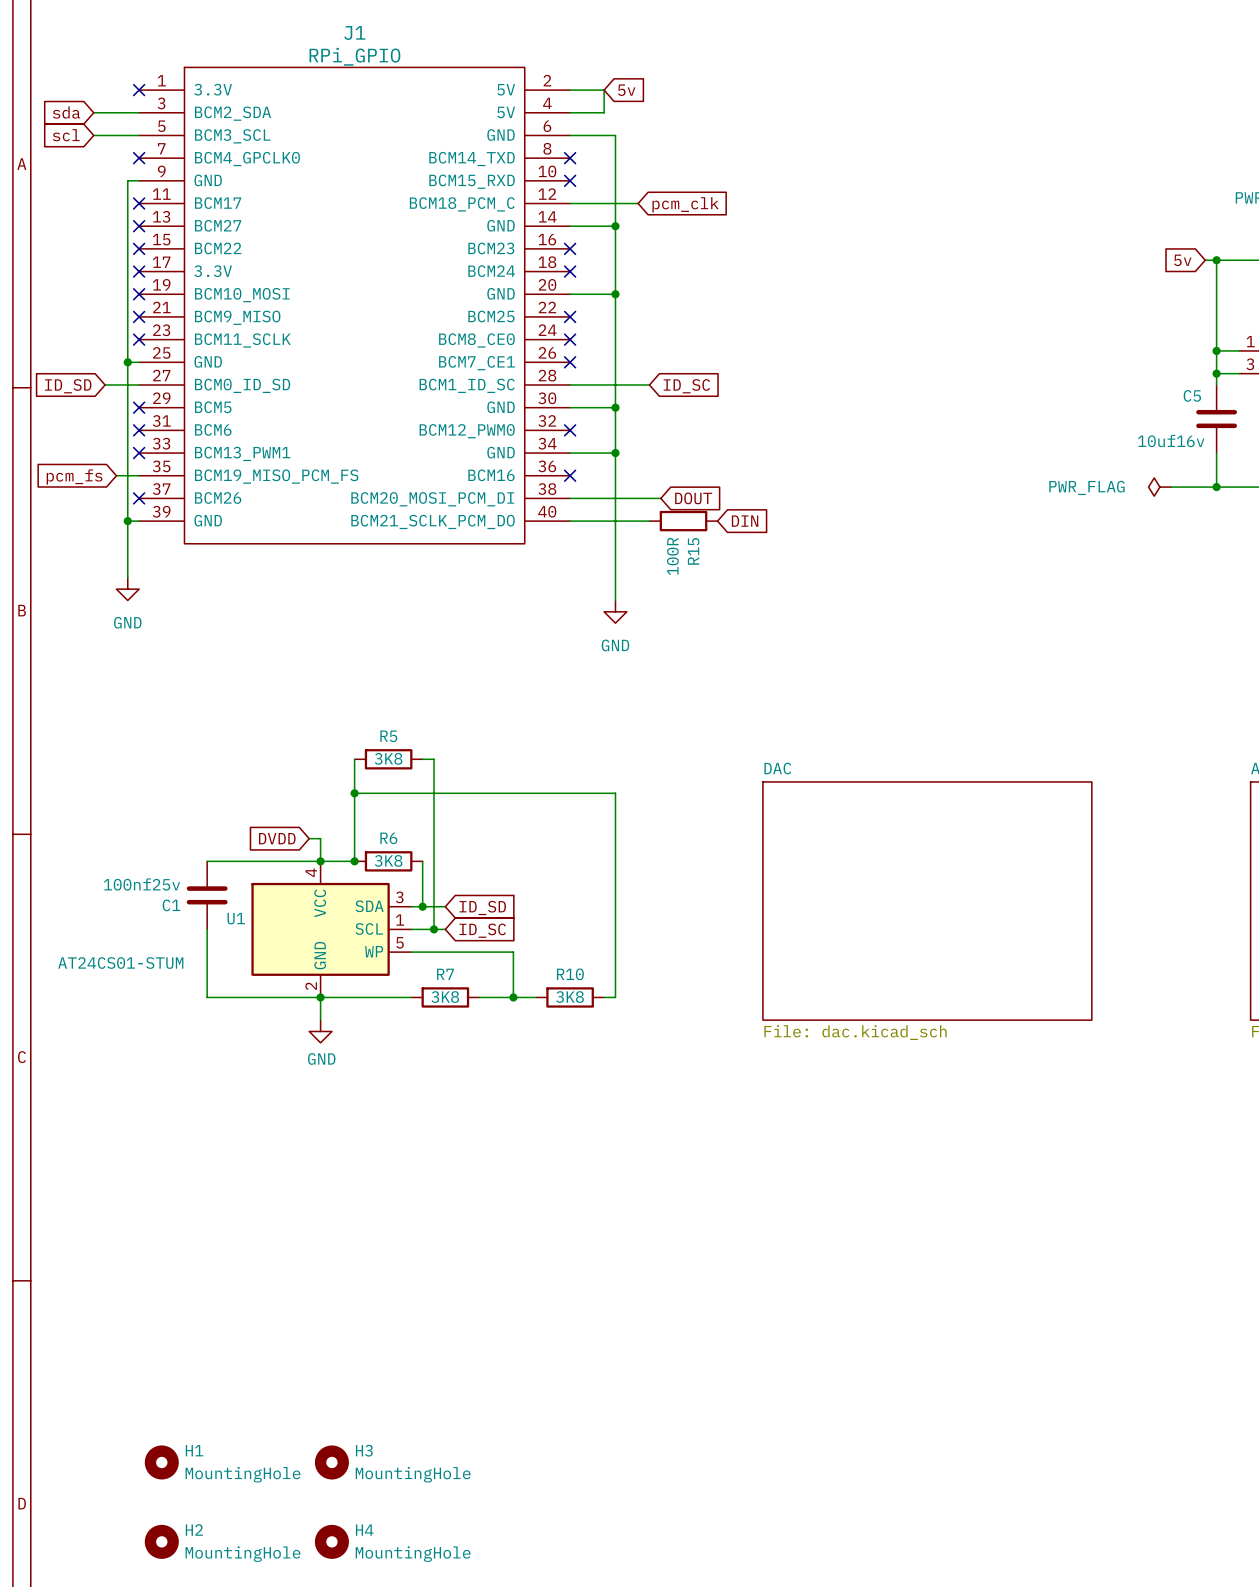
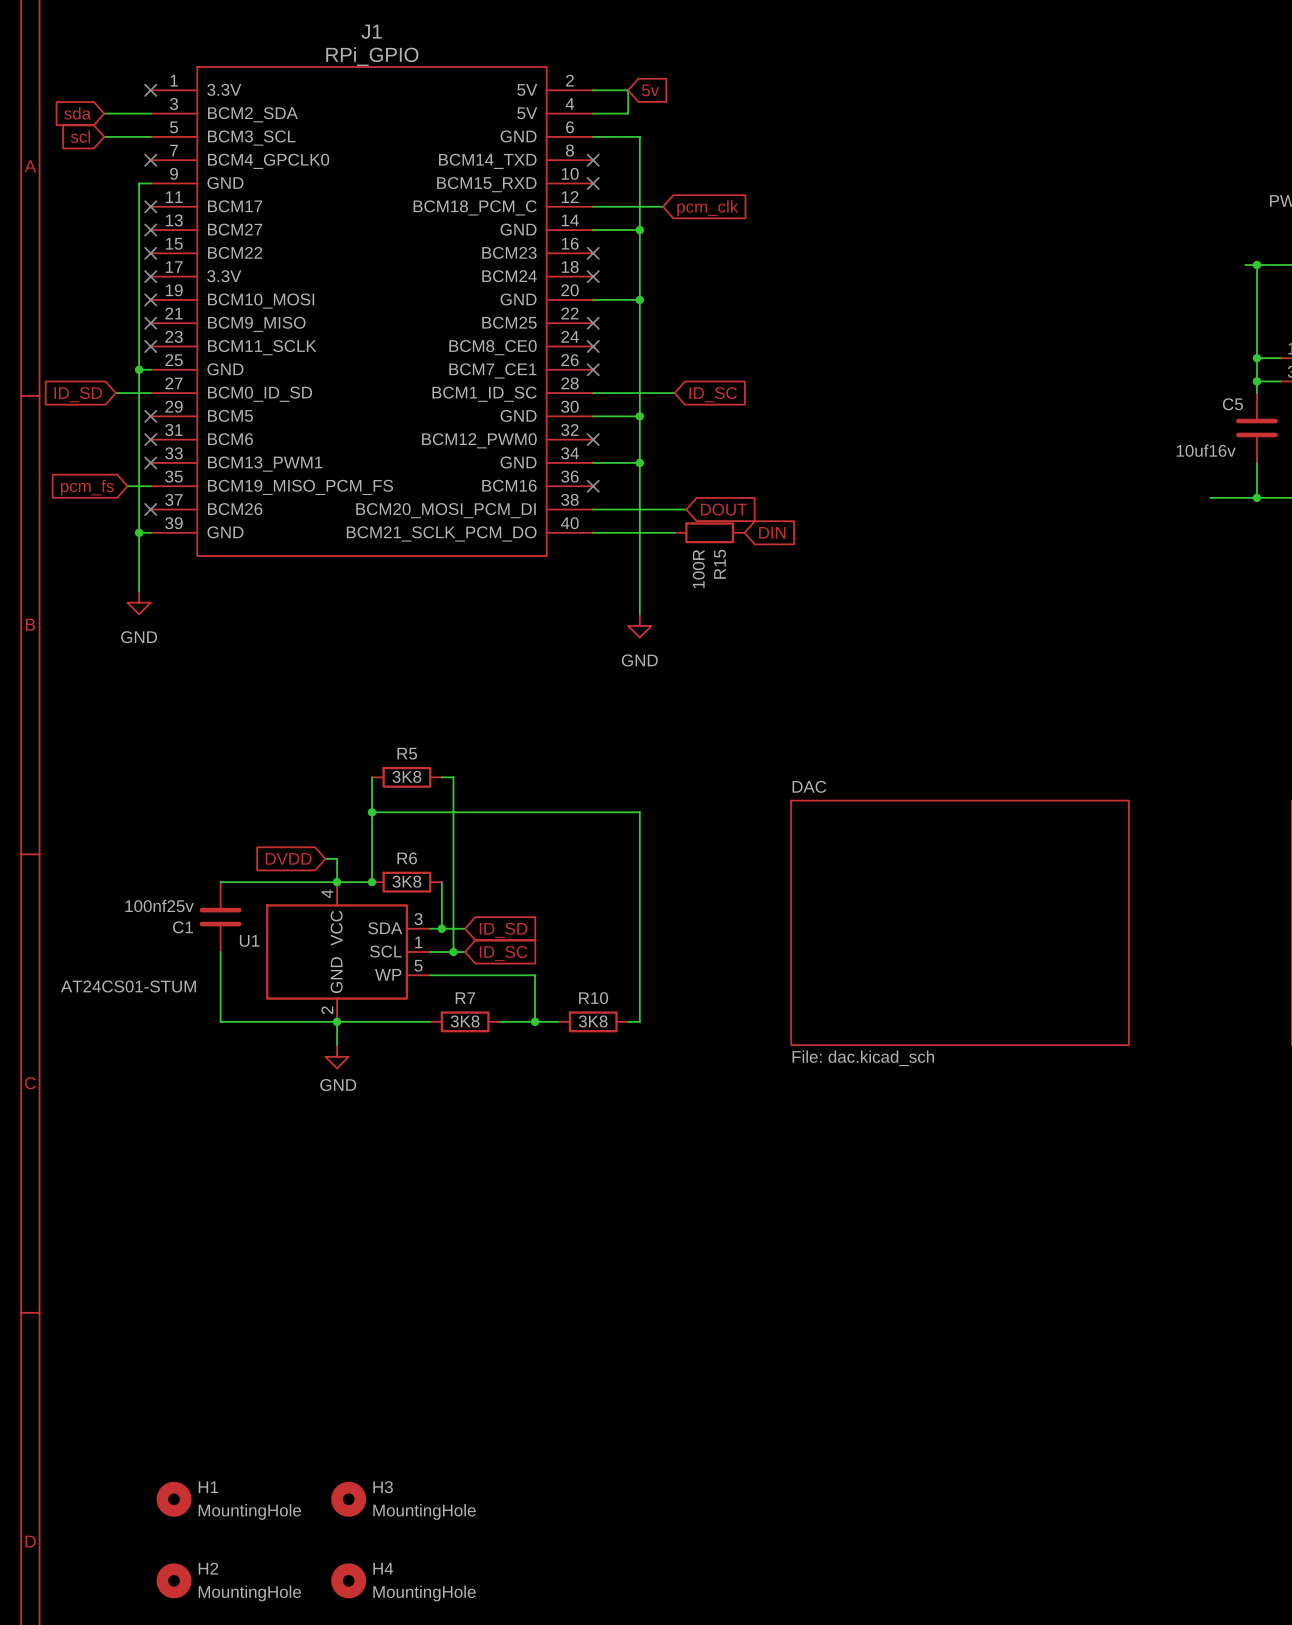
global label: 5v (1182, 260) -> none
power symbol: PWR_FLAG (1159, 487) -> none

